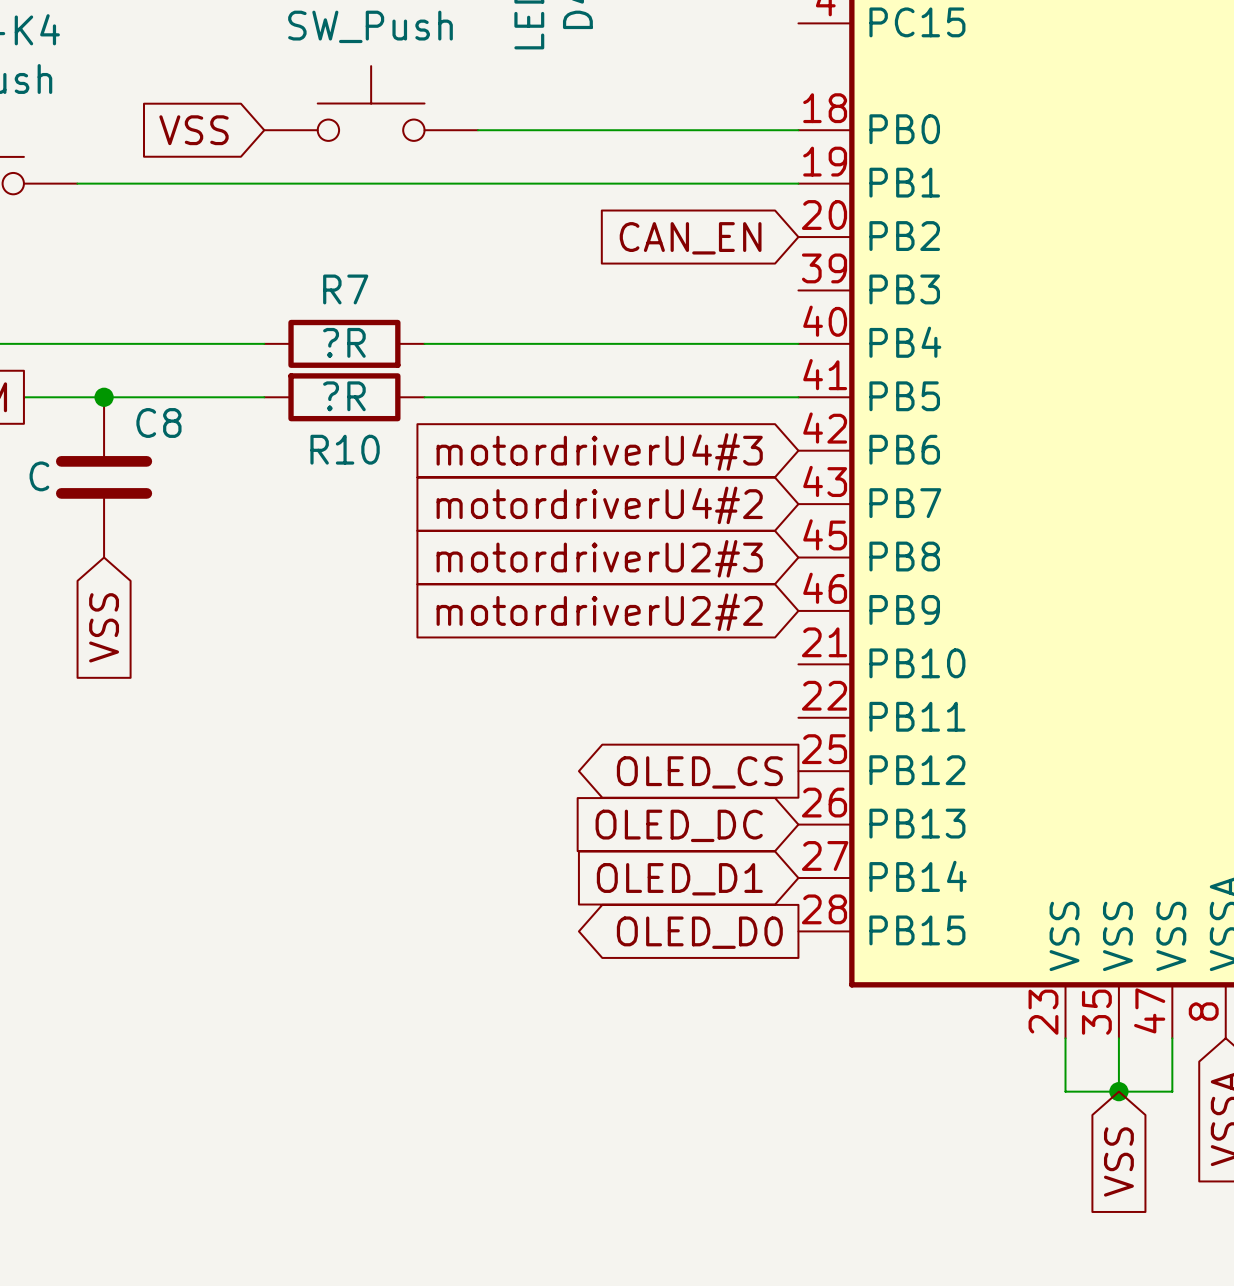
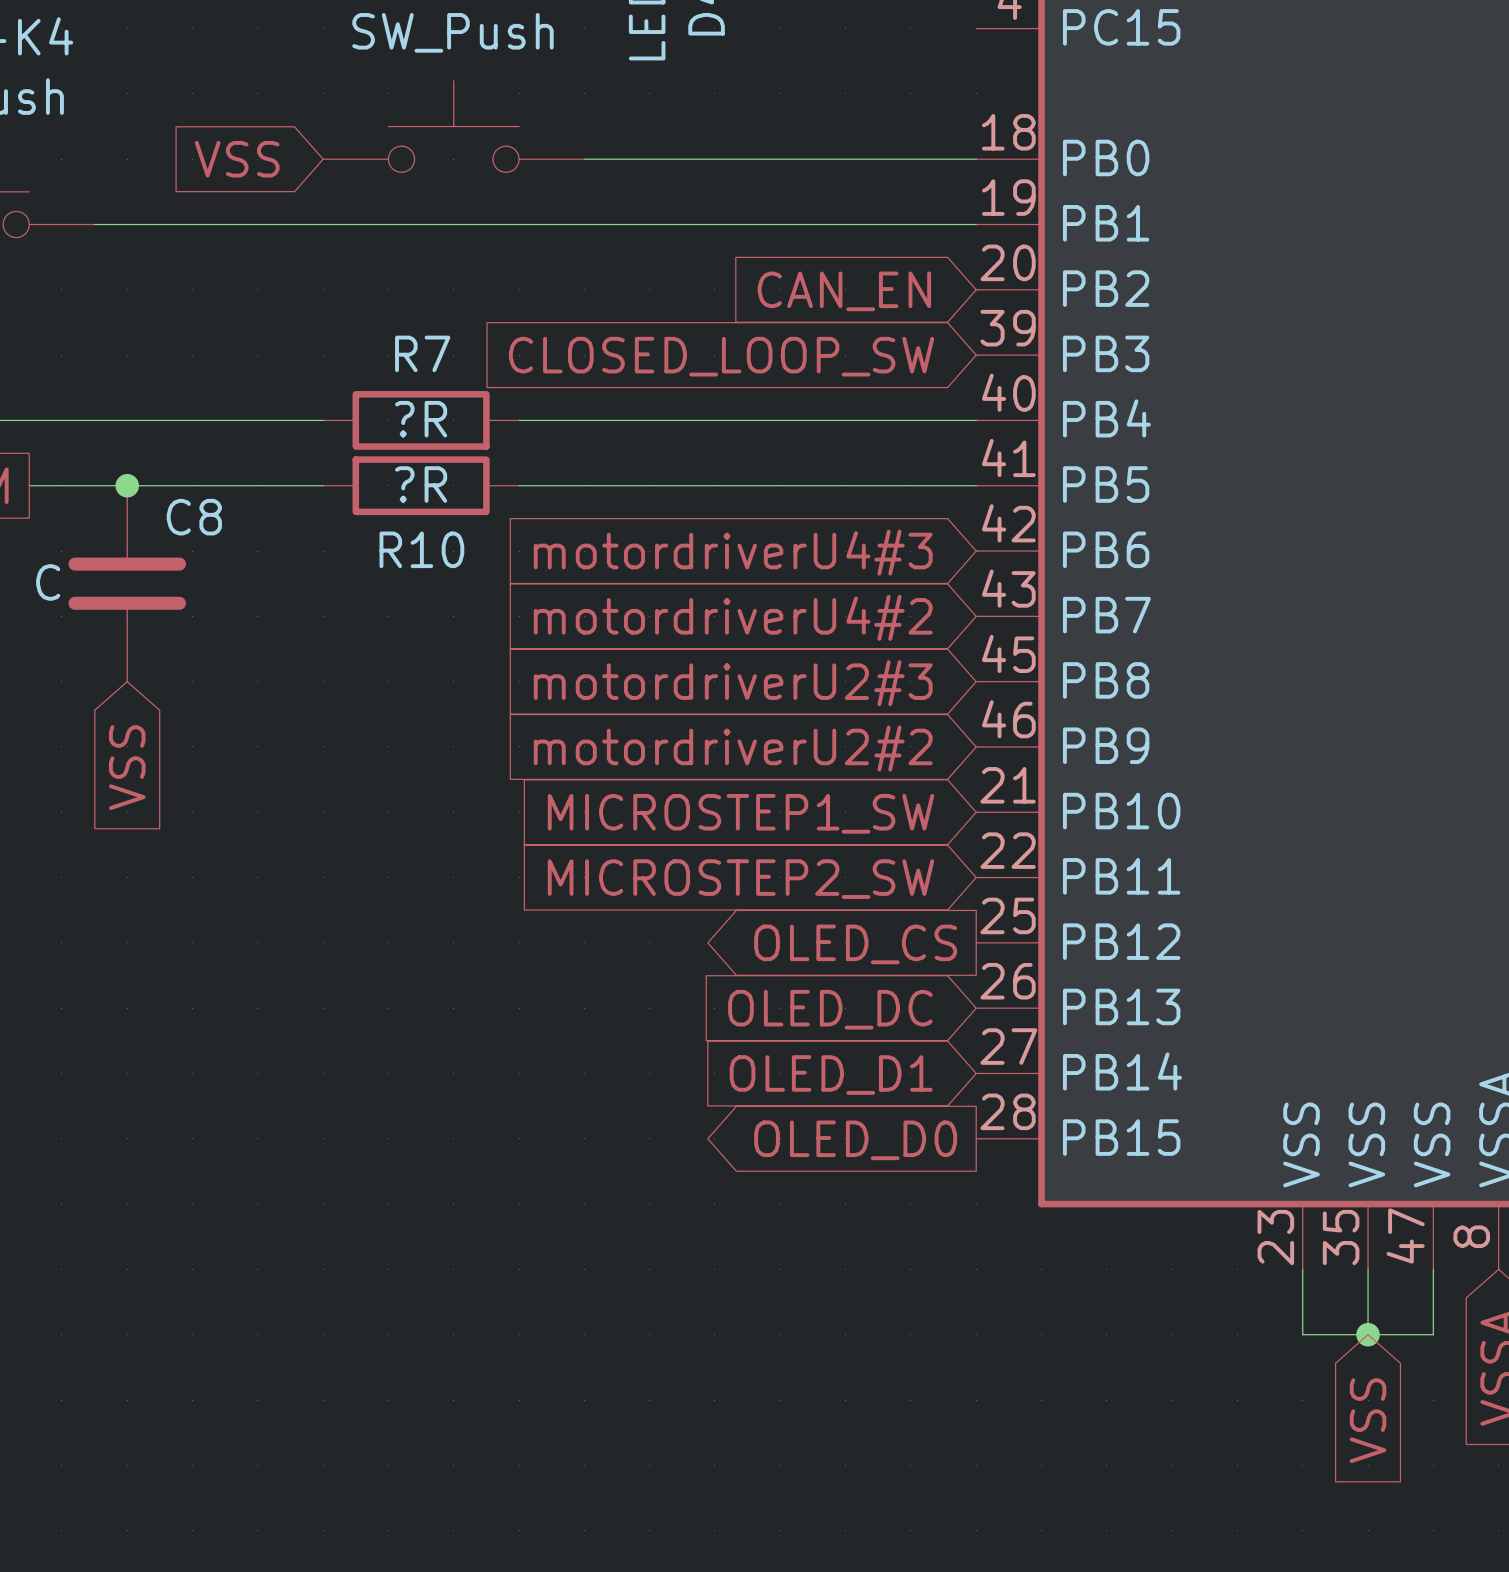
global label: none -> CLOSED_LOOP_SW (721, 356)
global label: none -> MICROSTEP1_SW (740, 813)
global label: none -> MICROSTEP2_SW (740, 879)

